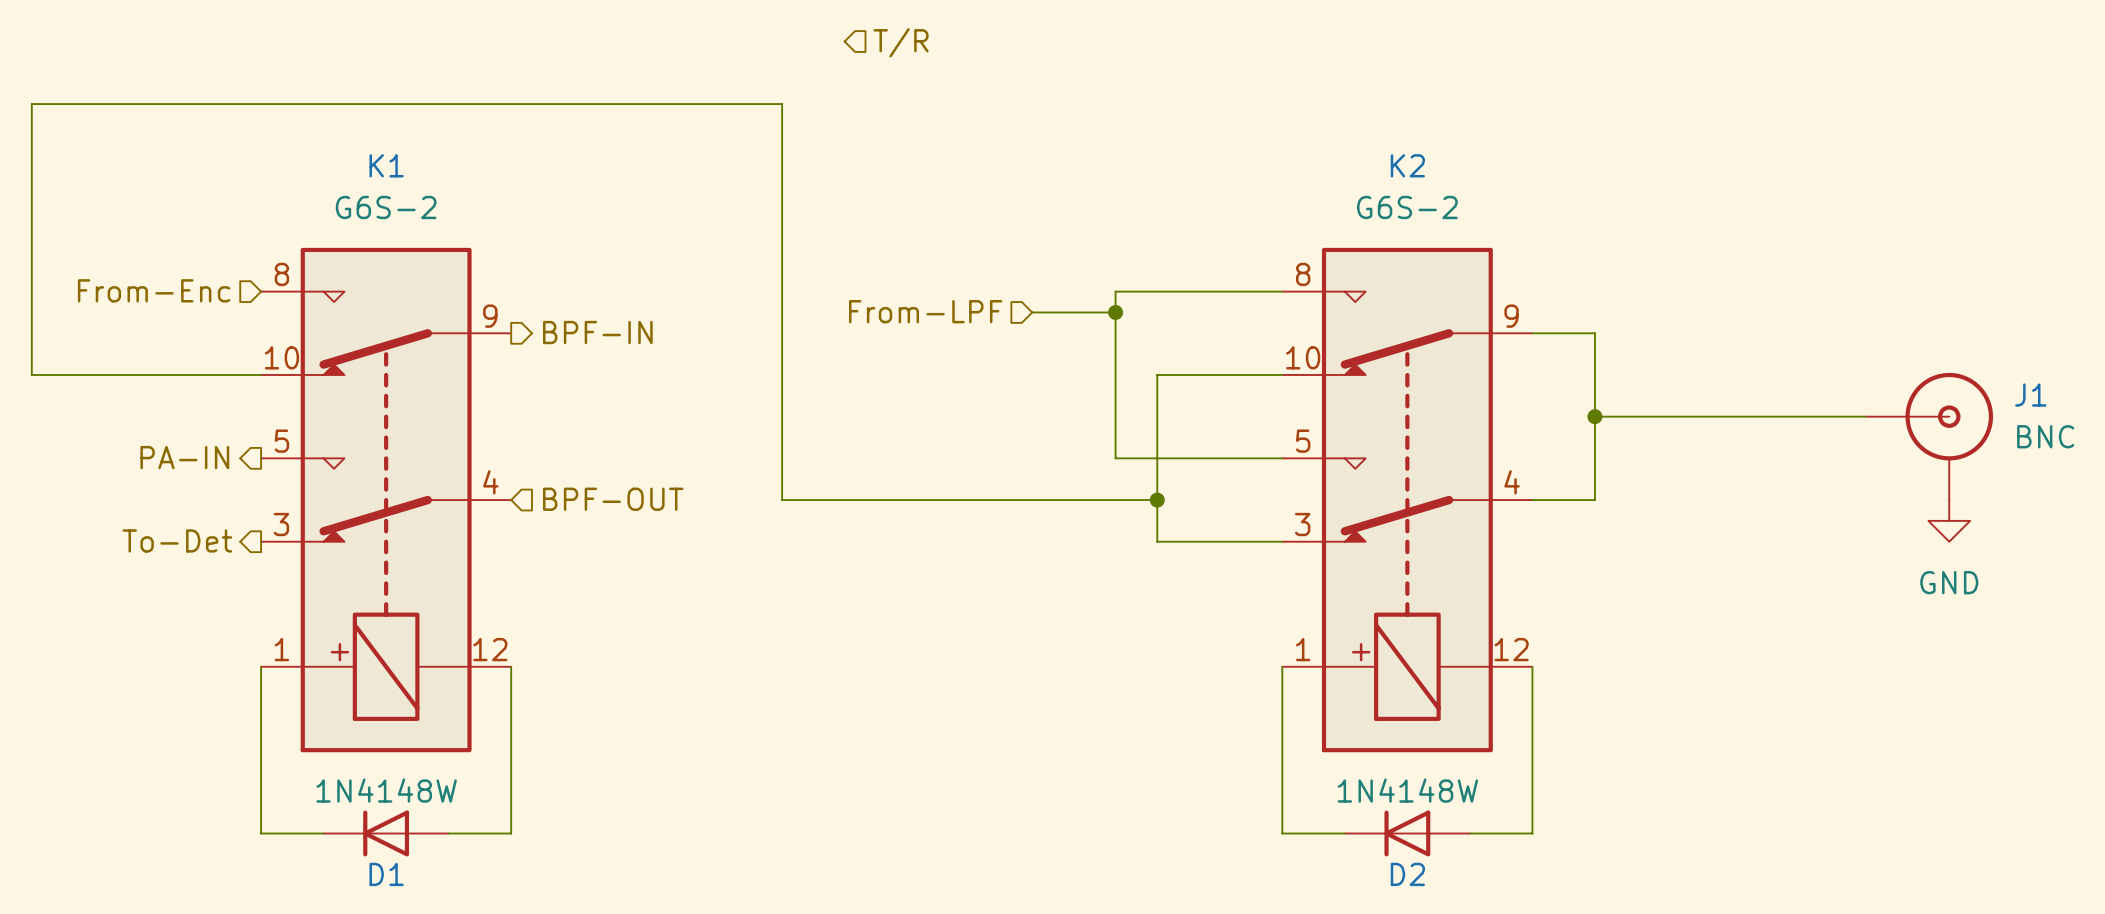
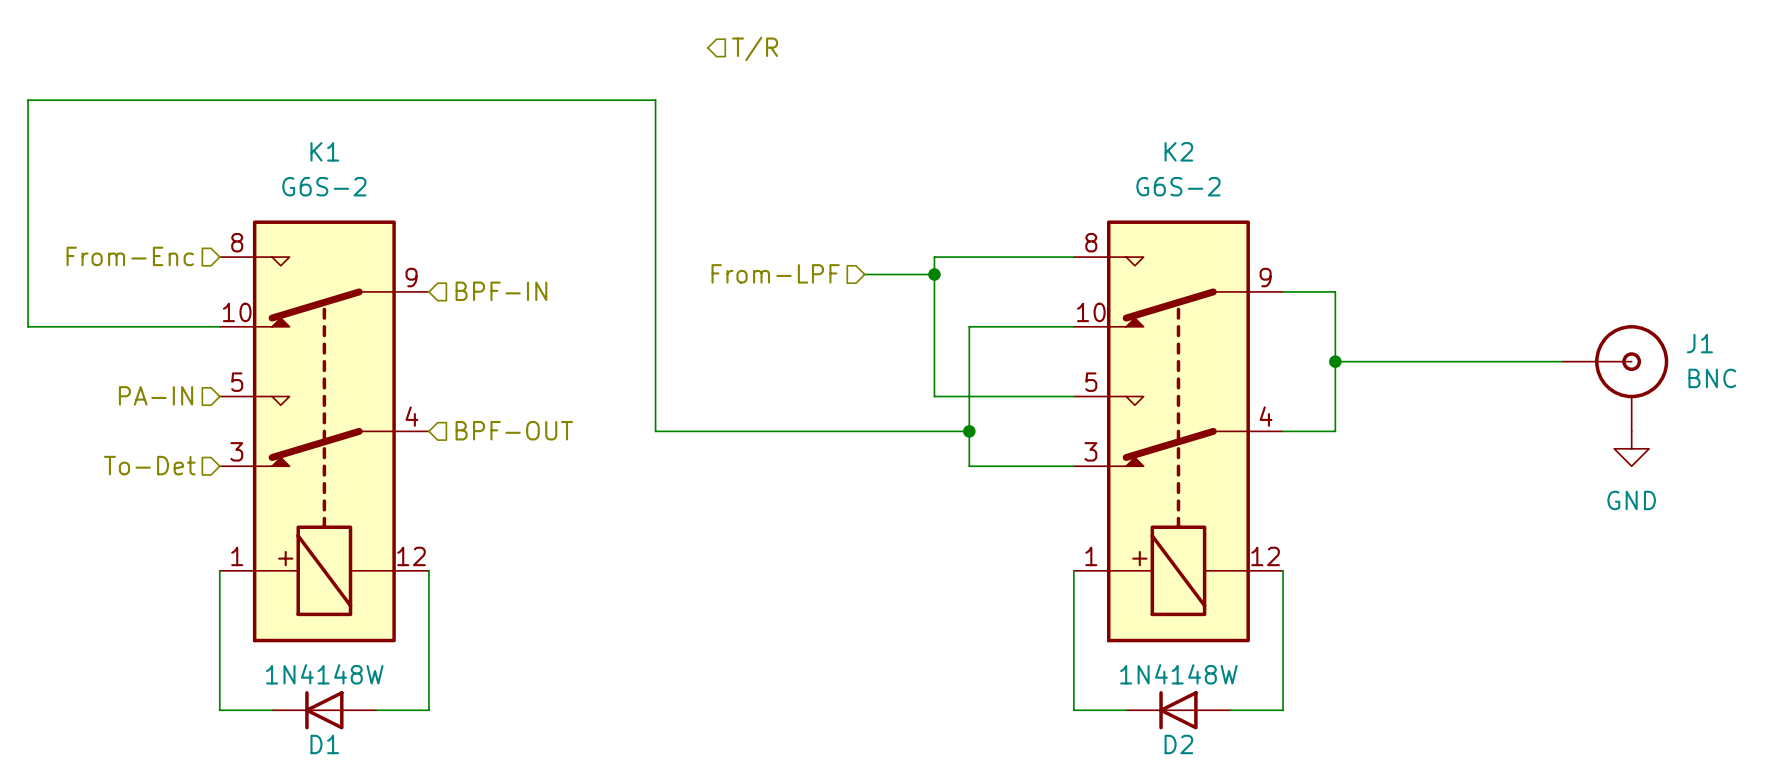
hierarchical label shape: output (597, 332) -> input (501, 291)
hierarchical label shape: output (184, 457) -> input (156, 395)
hierarchical label shape: output (177, 540) -> input (149, 465)

